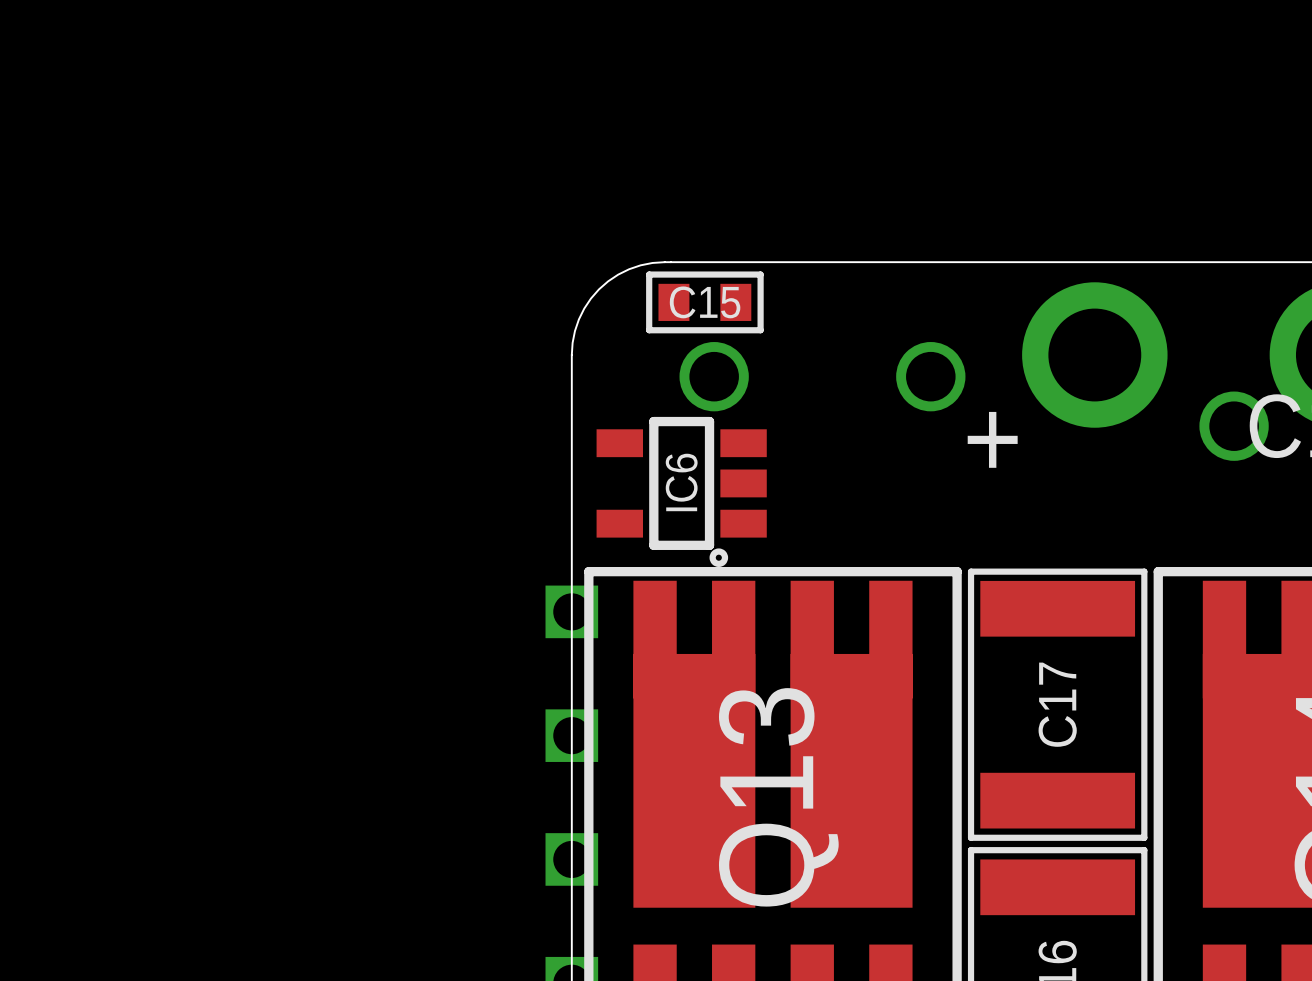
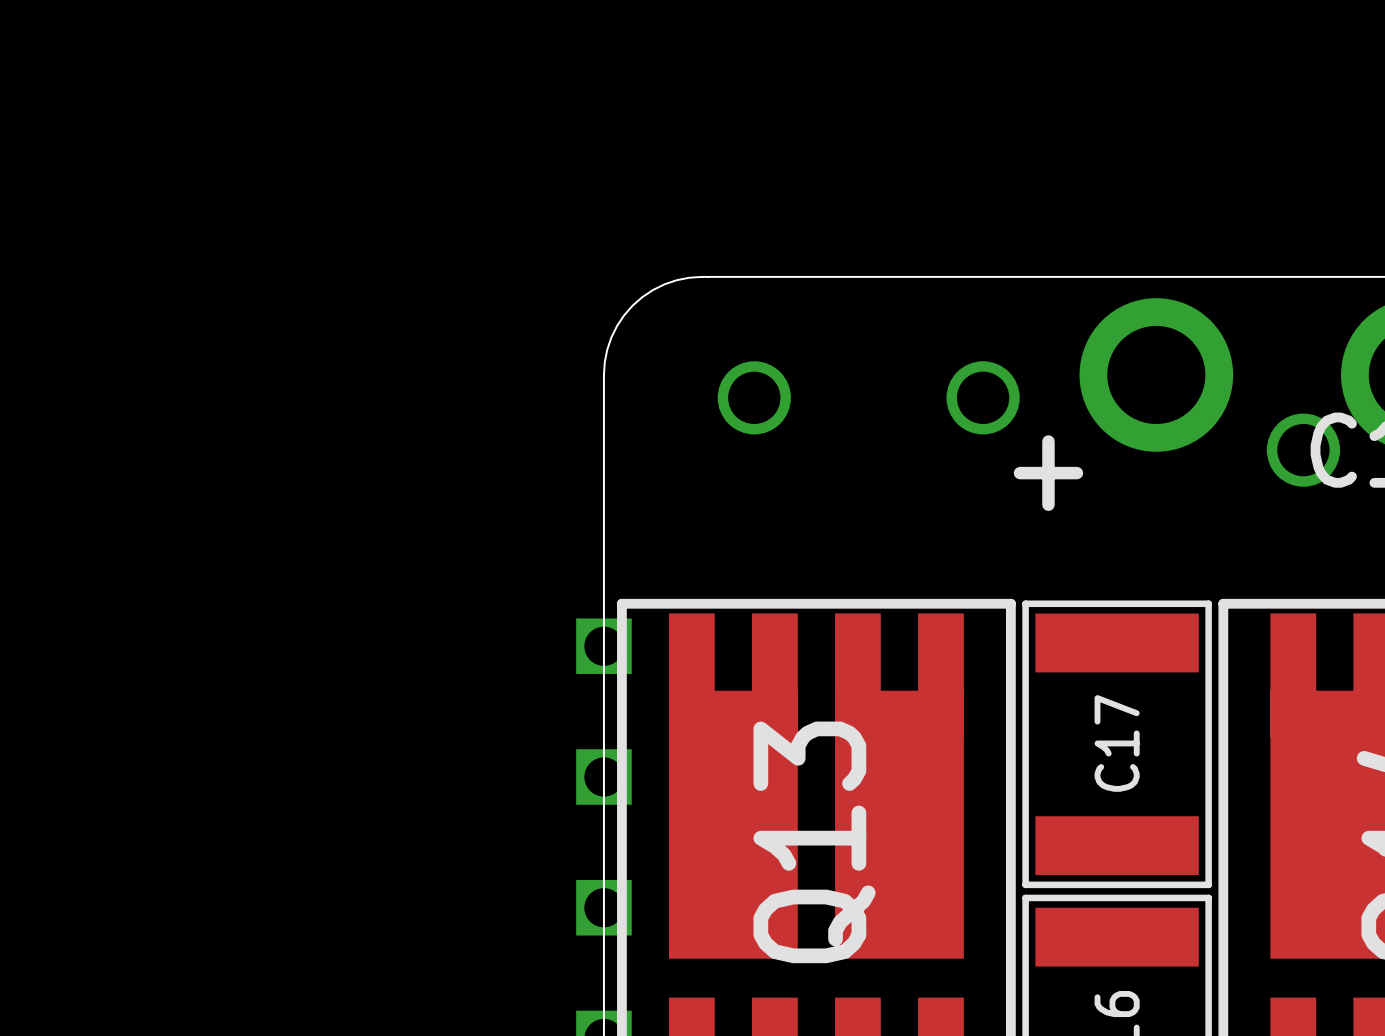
C15: (704, 302) -> none
IC6: (681, 491) -> none

